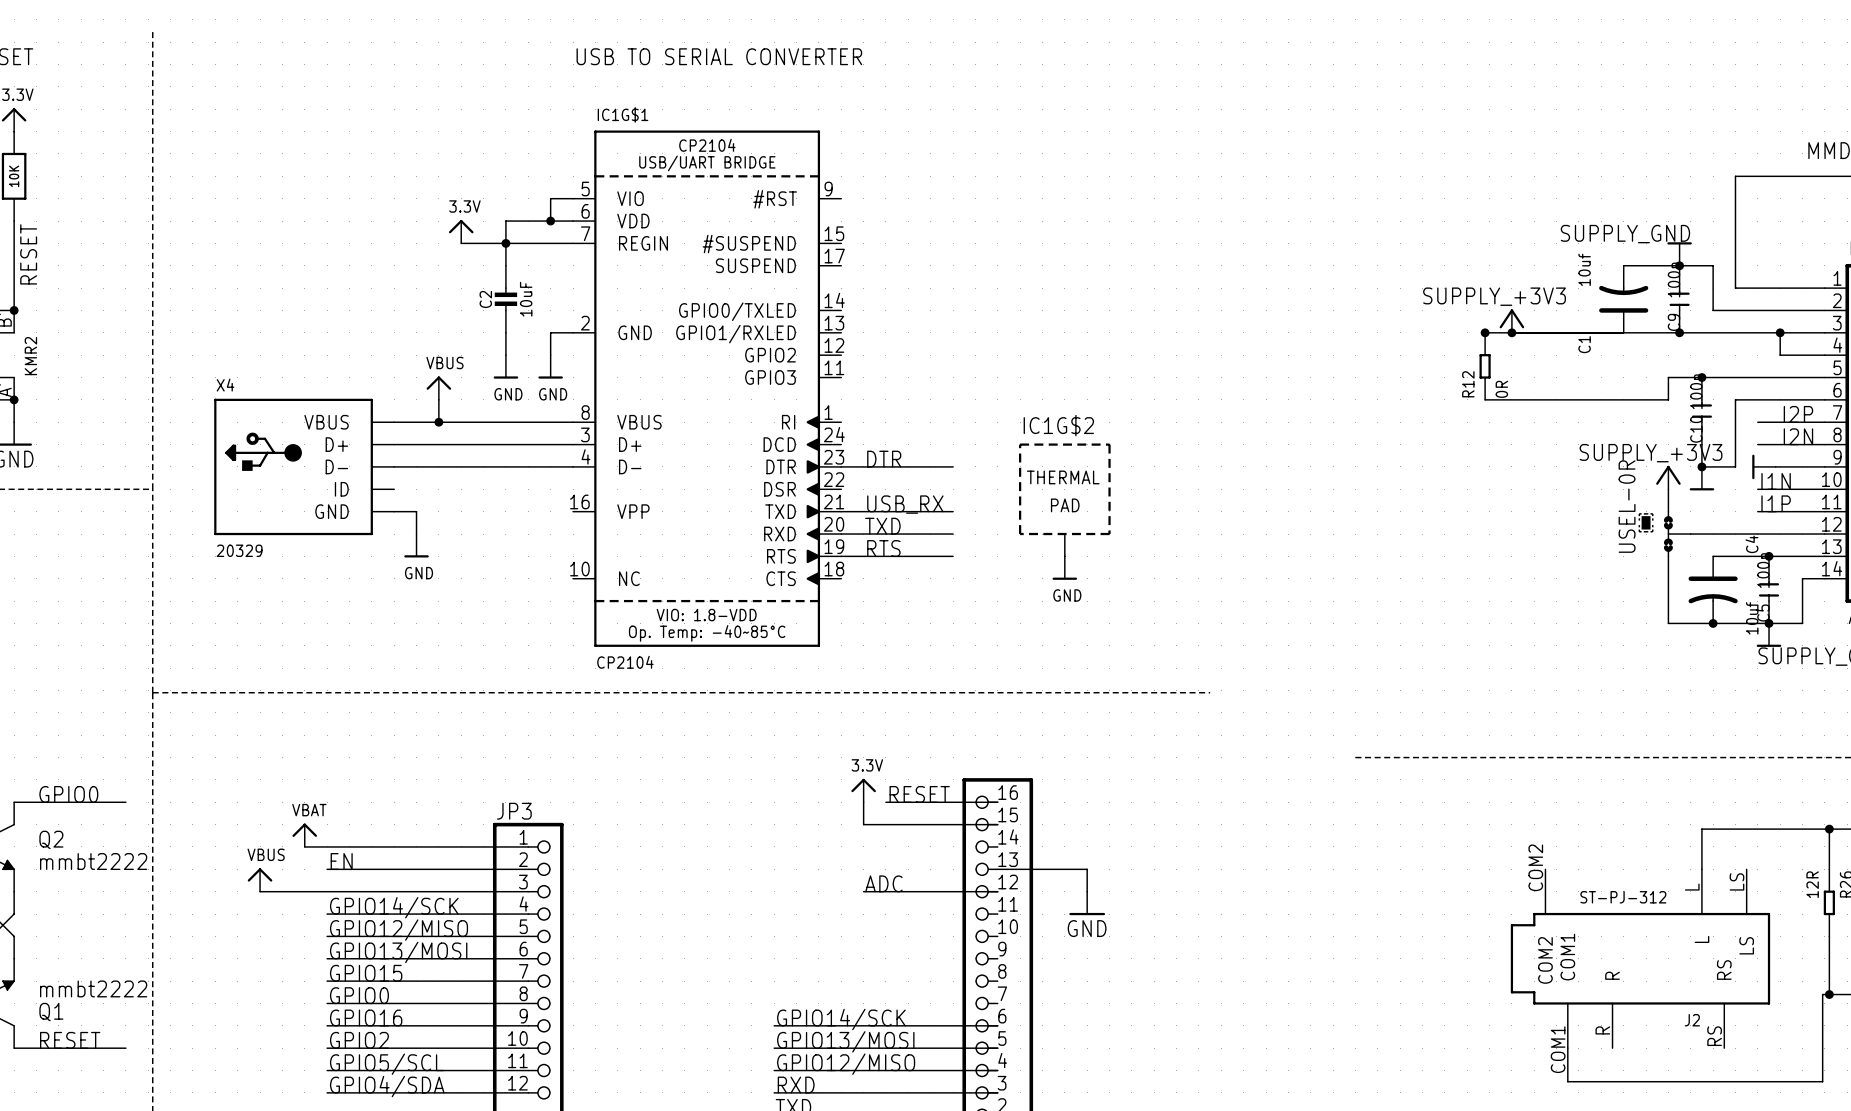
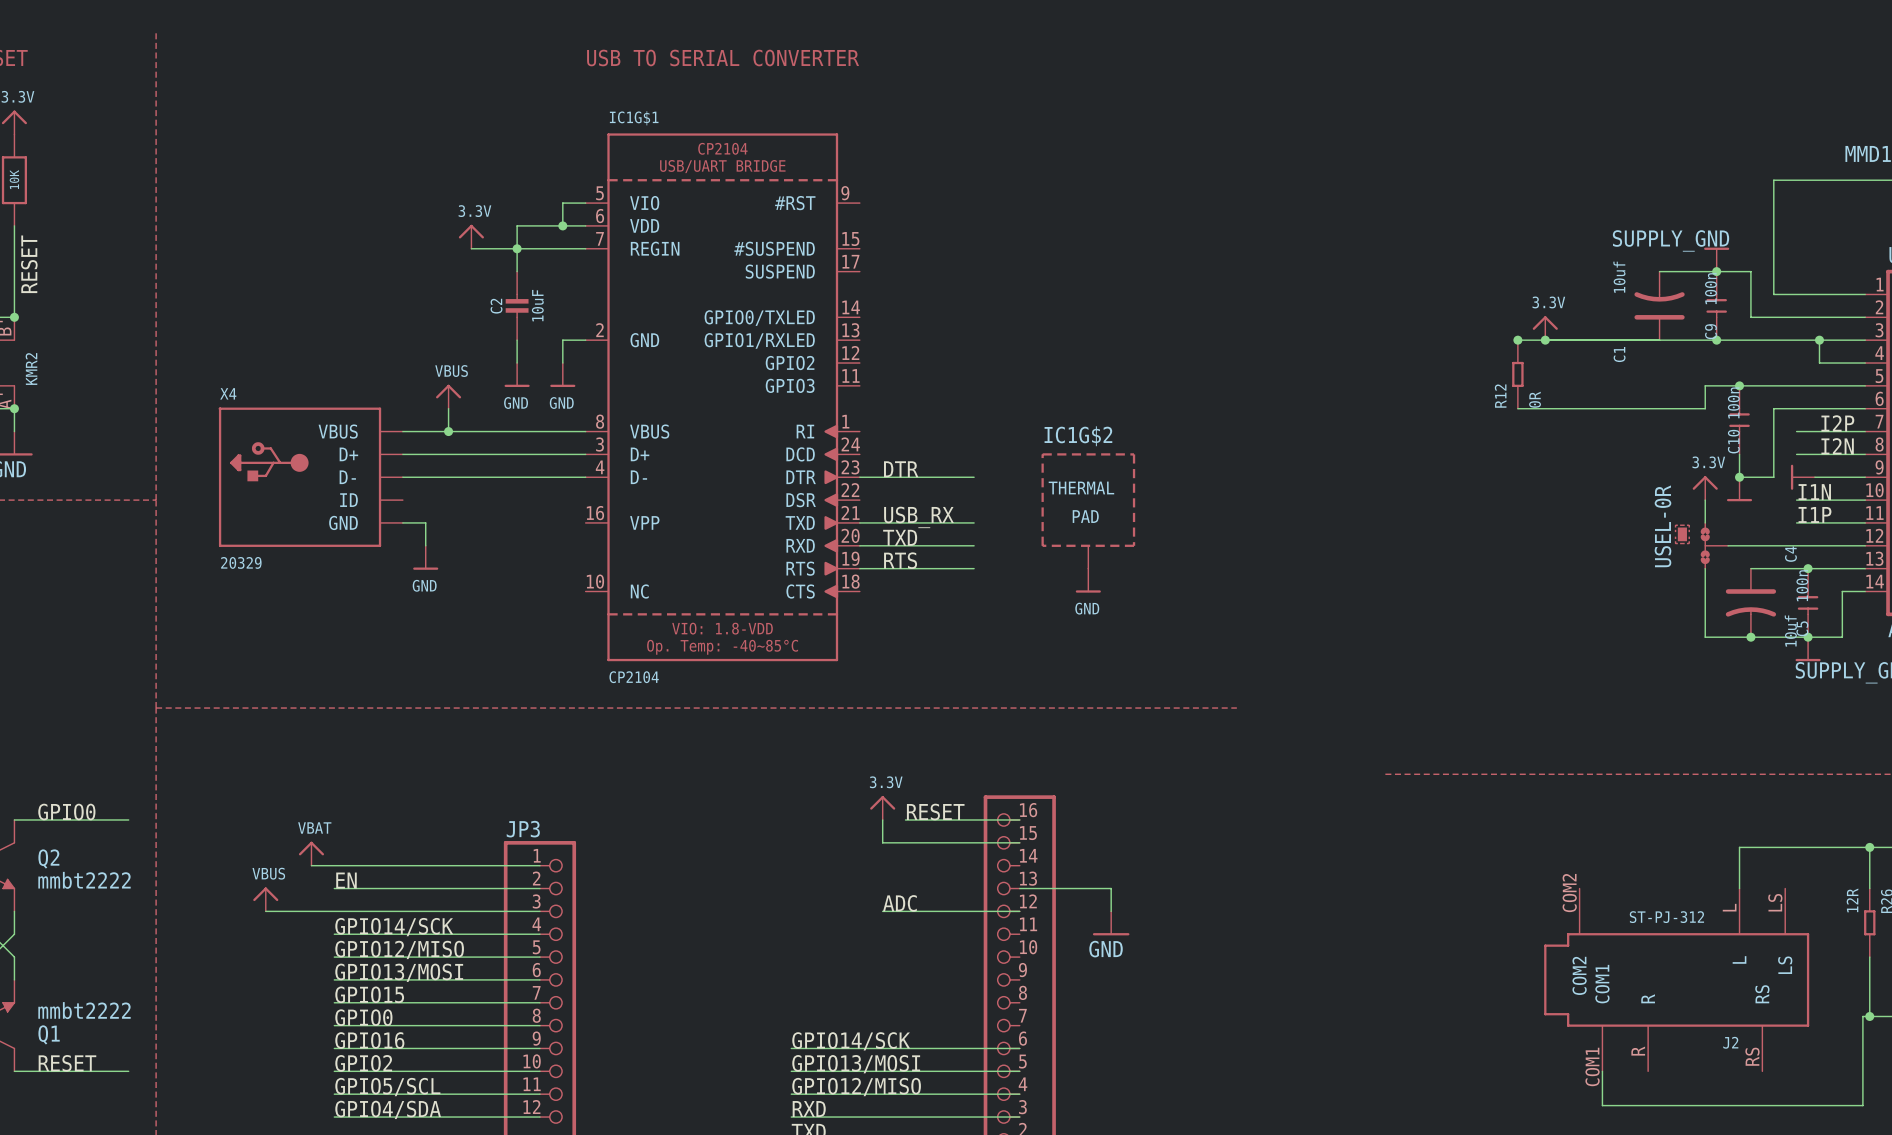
power symbol: SUPPLY_+3V3 (1511, 321) -> 3.3V (1545, 328)
power symbol: SUPPLY_+3V3 (1668, 477) -> 3.3V (1705, 488)

